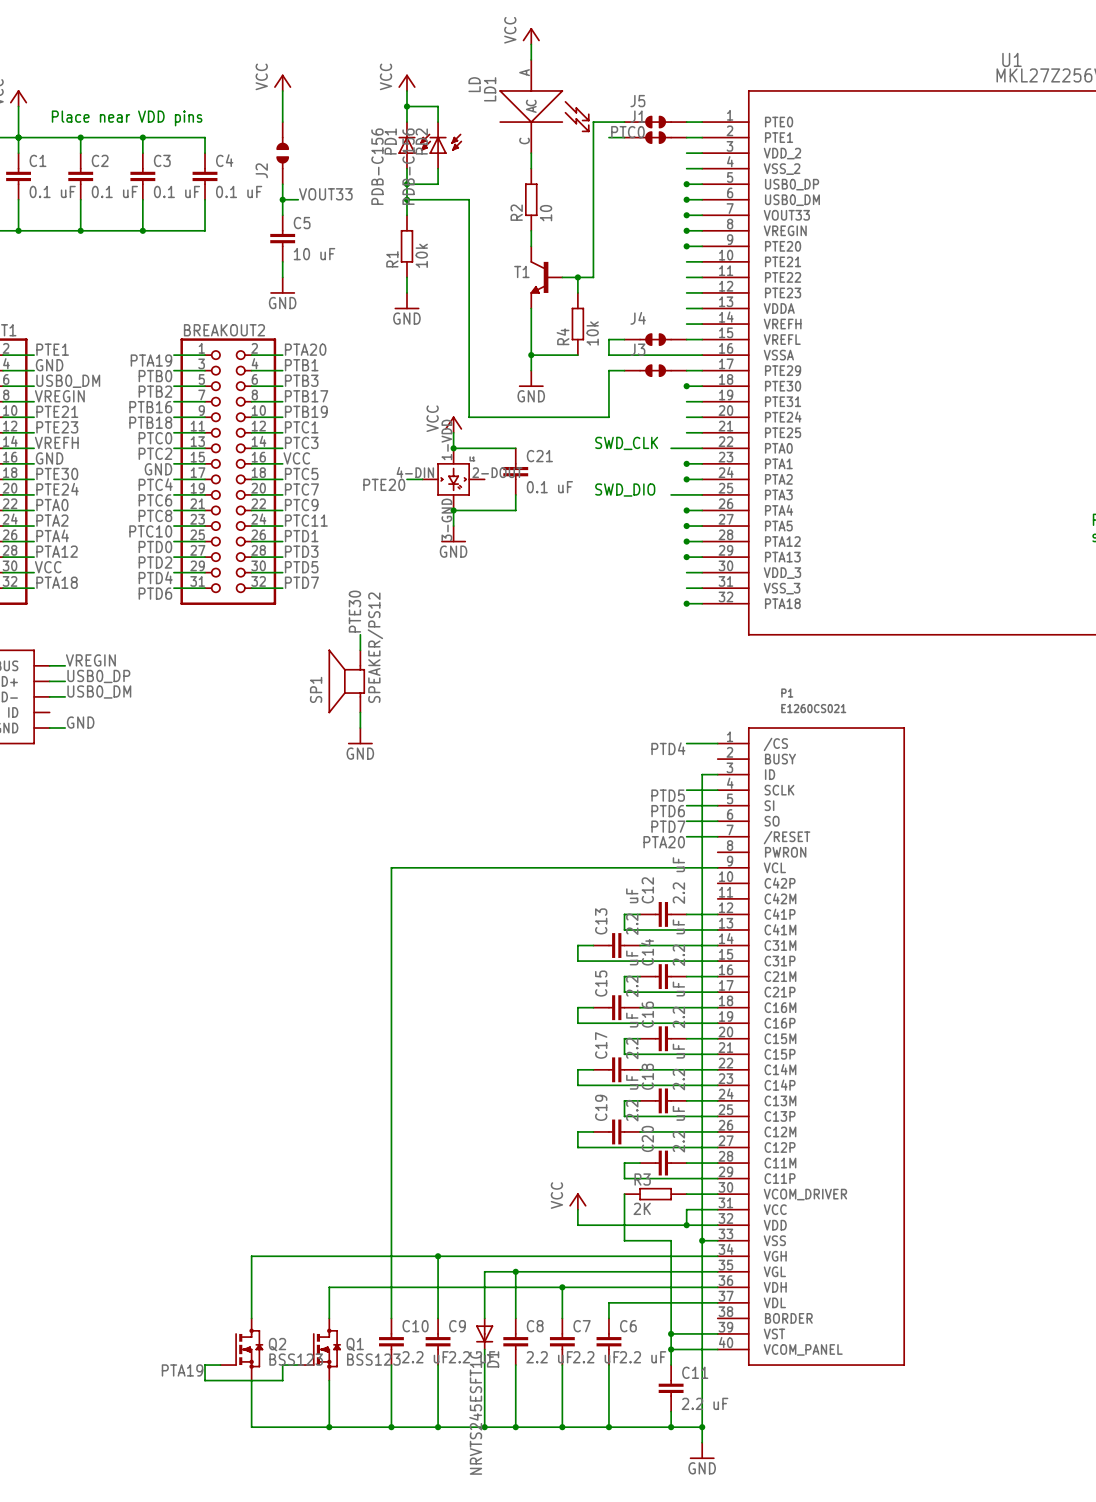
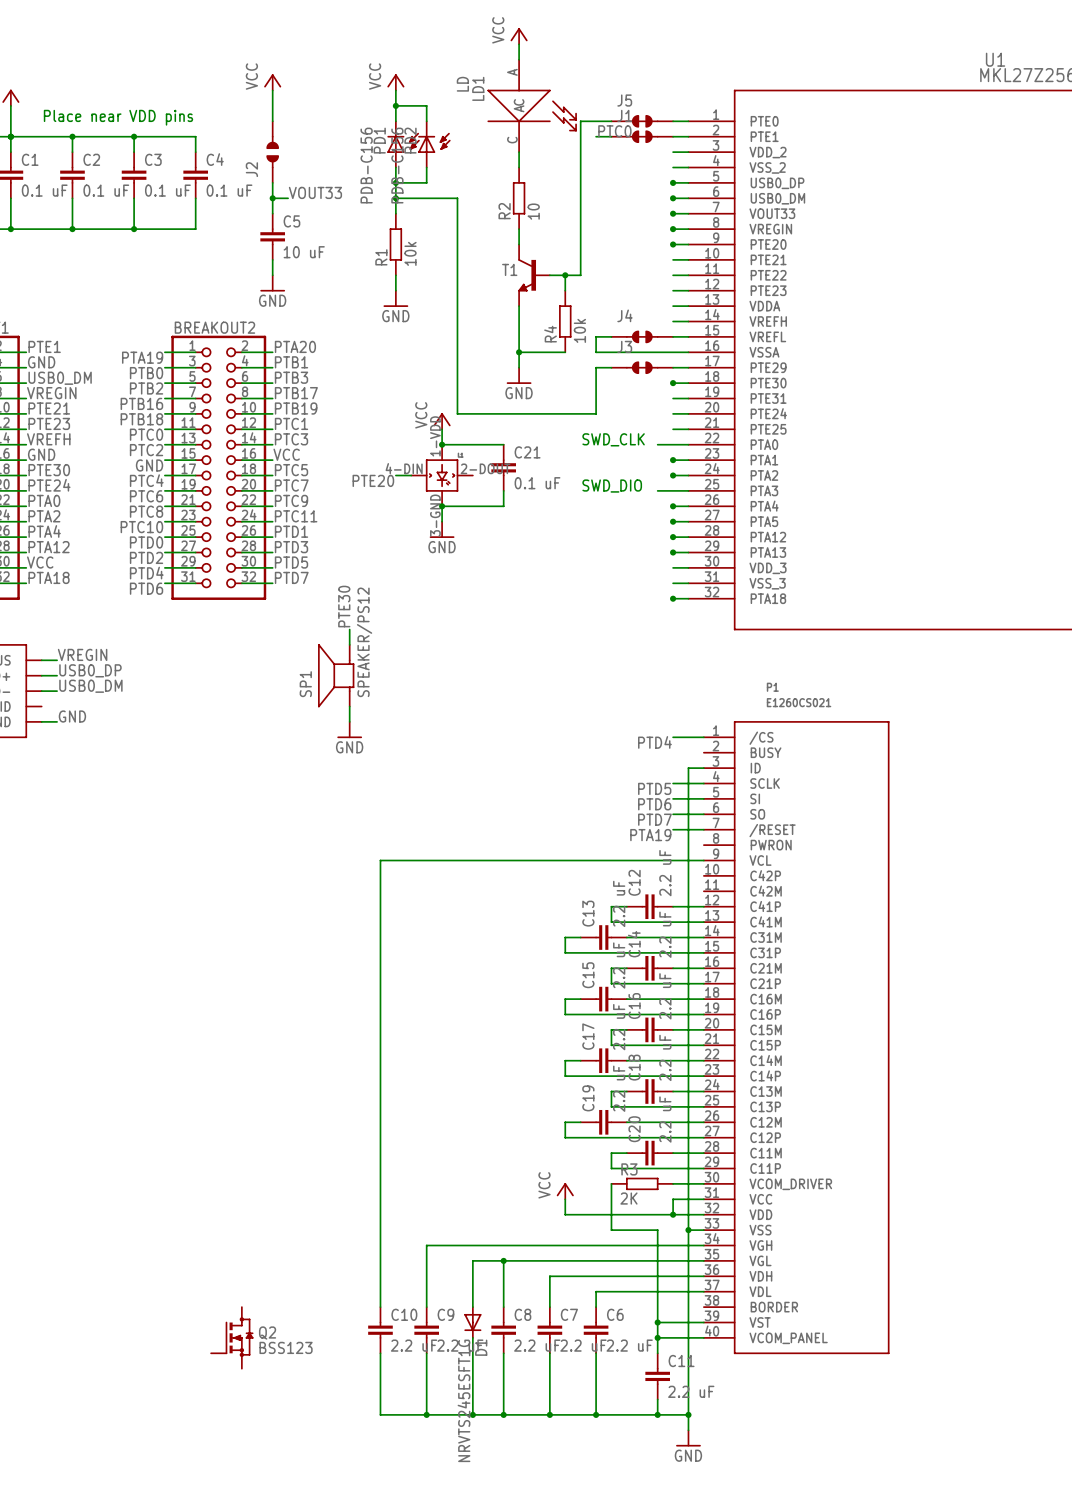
label: PTA20 (664, 842) -> PTA19 (650, 835)
wire: (438, 1256) (251, 1256) (251, 1318) -> none
junction: (438, 1256) -> none
wire: (562, 1287) (329, 1287) (329, 1318) -> none
junction: (562, 1287) -> none
Q1: BSS123 (319, 1349) -> none
wire: (220, 1365) (205, 1365) (205, 1380) (282, 1380) (282, 1365) (298, 1365) -> none
label: PTA19 (182, 1370) -> none
wire: (251, 1380) (251, 1427) (391, 1427) -> none
wire: (329, 1380) (329, 1427) -> none
junction: (329, 1427) -> none
junction: (391, 1427) -> none

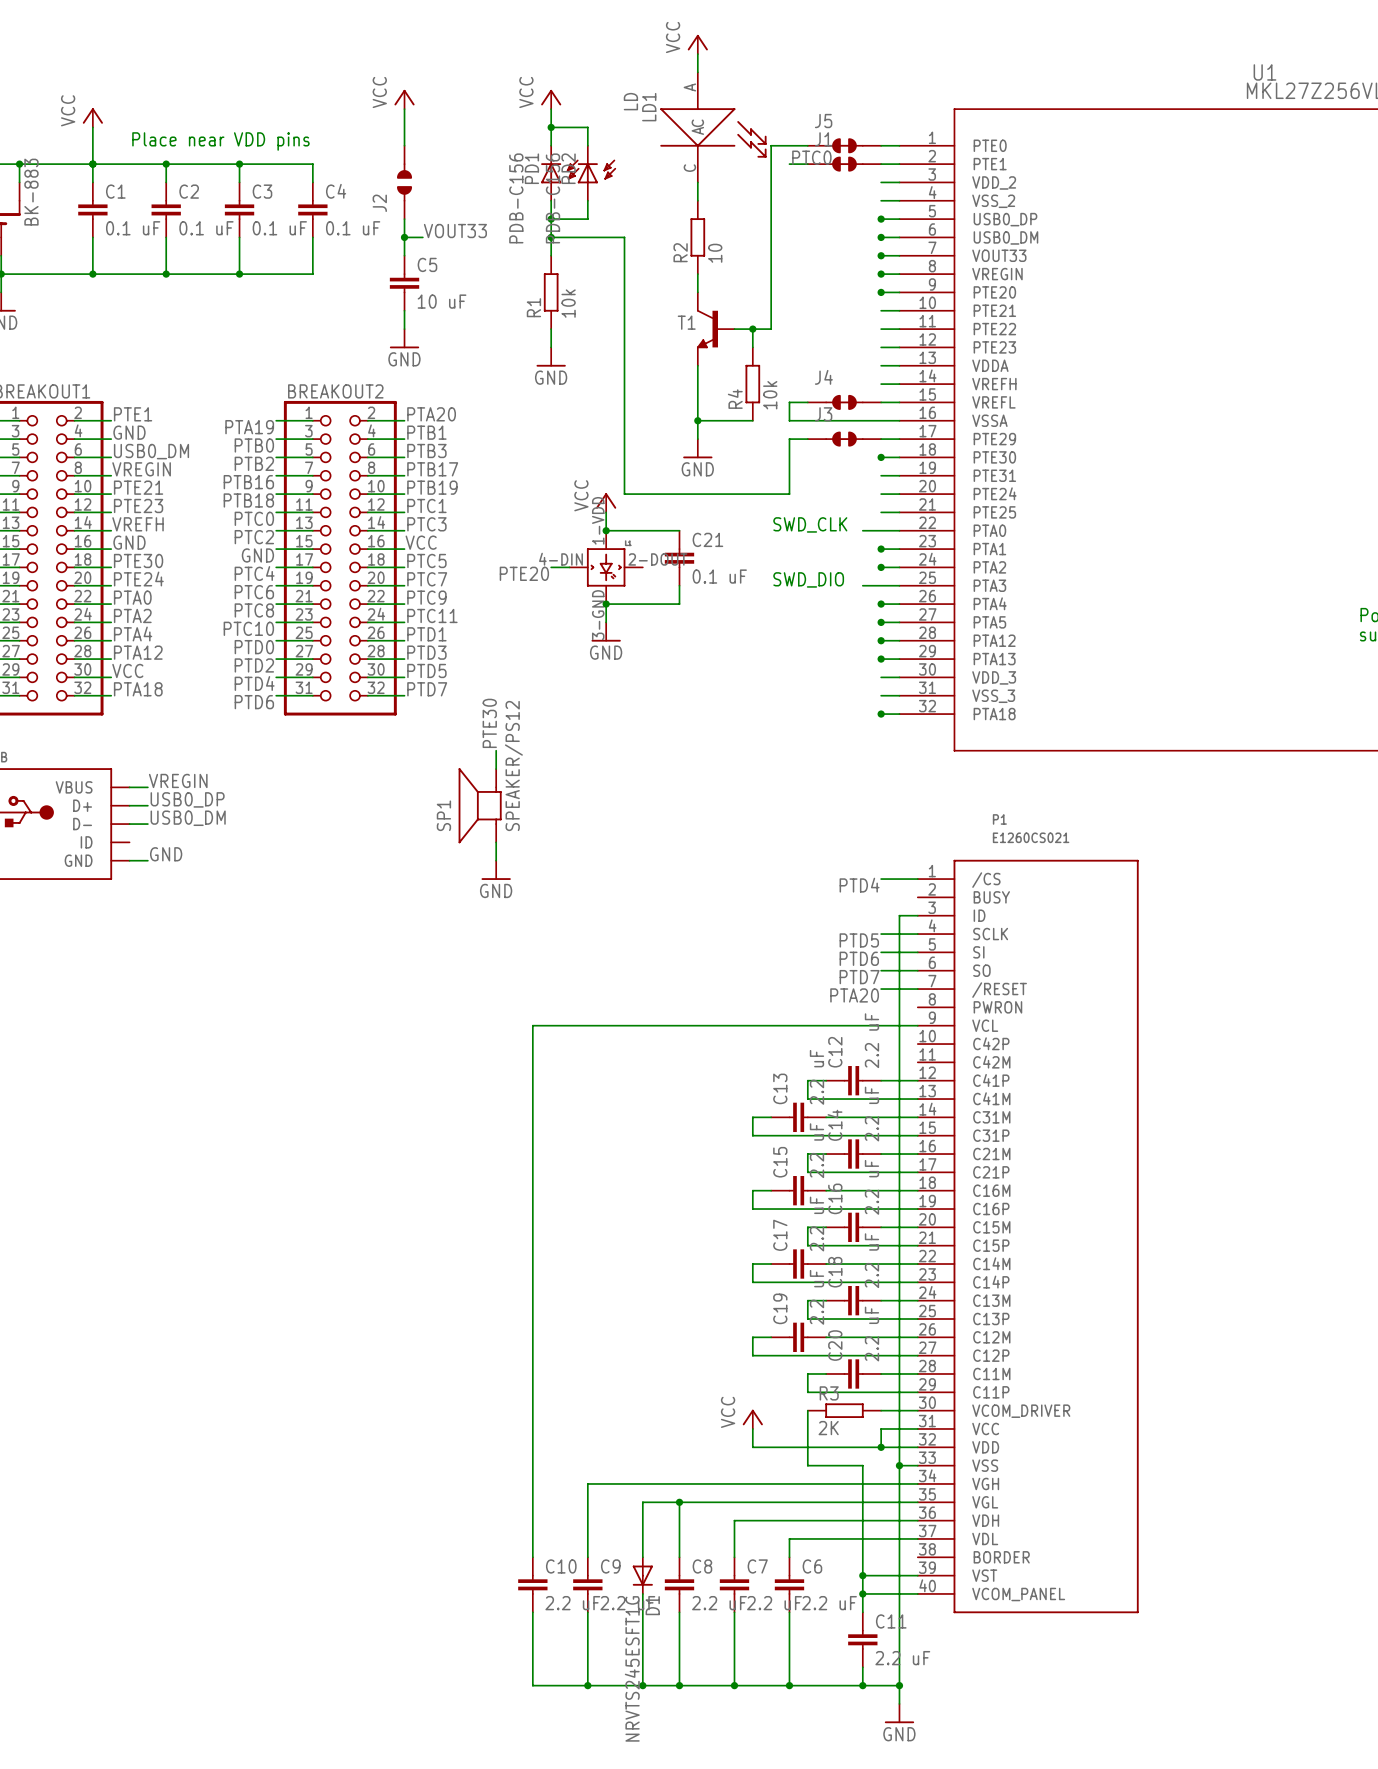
label: PTA19 (650, 835) -> PTA20 (854, 995)
Q2: BSS123 (232, 1337) -> none

